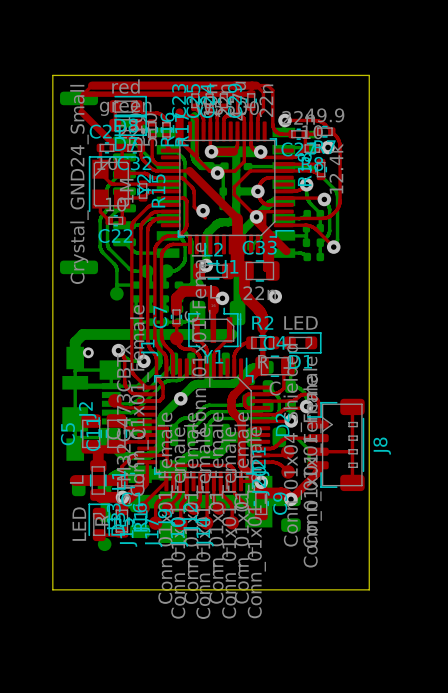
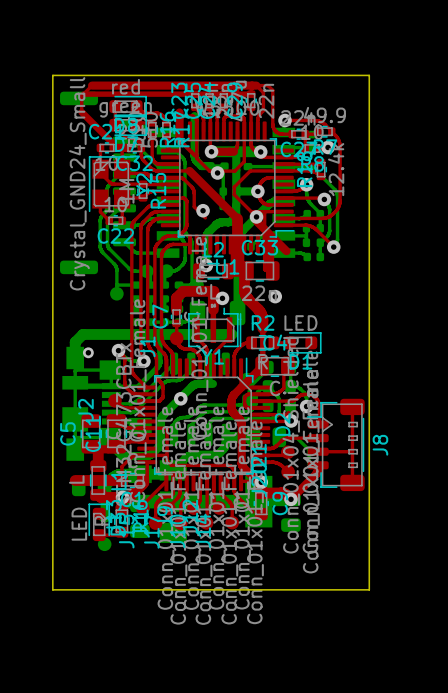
bottom track: (268, 367) (251, 368) (233, 383) (212, 383) -> none
bottom track: (248, 400) (241, 405) (206, 405) (194, 416) (182, 419) (174, 426) -> (269, 367) (251, 386) (248, 398) (244, 403) (202, 405) (189, 416) (177, 419) (174, 426)
bottom track: (268, 405) (259, 411) (211, 412) (191, 430) -> (267, 388) (261, 388) (257, 392) (255, 405) (250, 410) (205, 412) (191, 424) (191, 430)
top track: (306, 406) (304, 408) (286, 408) (274, 414) -> (288, 412) (286, 414) (274, 414)

